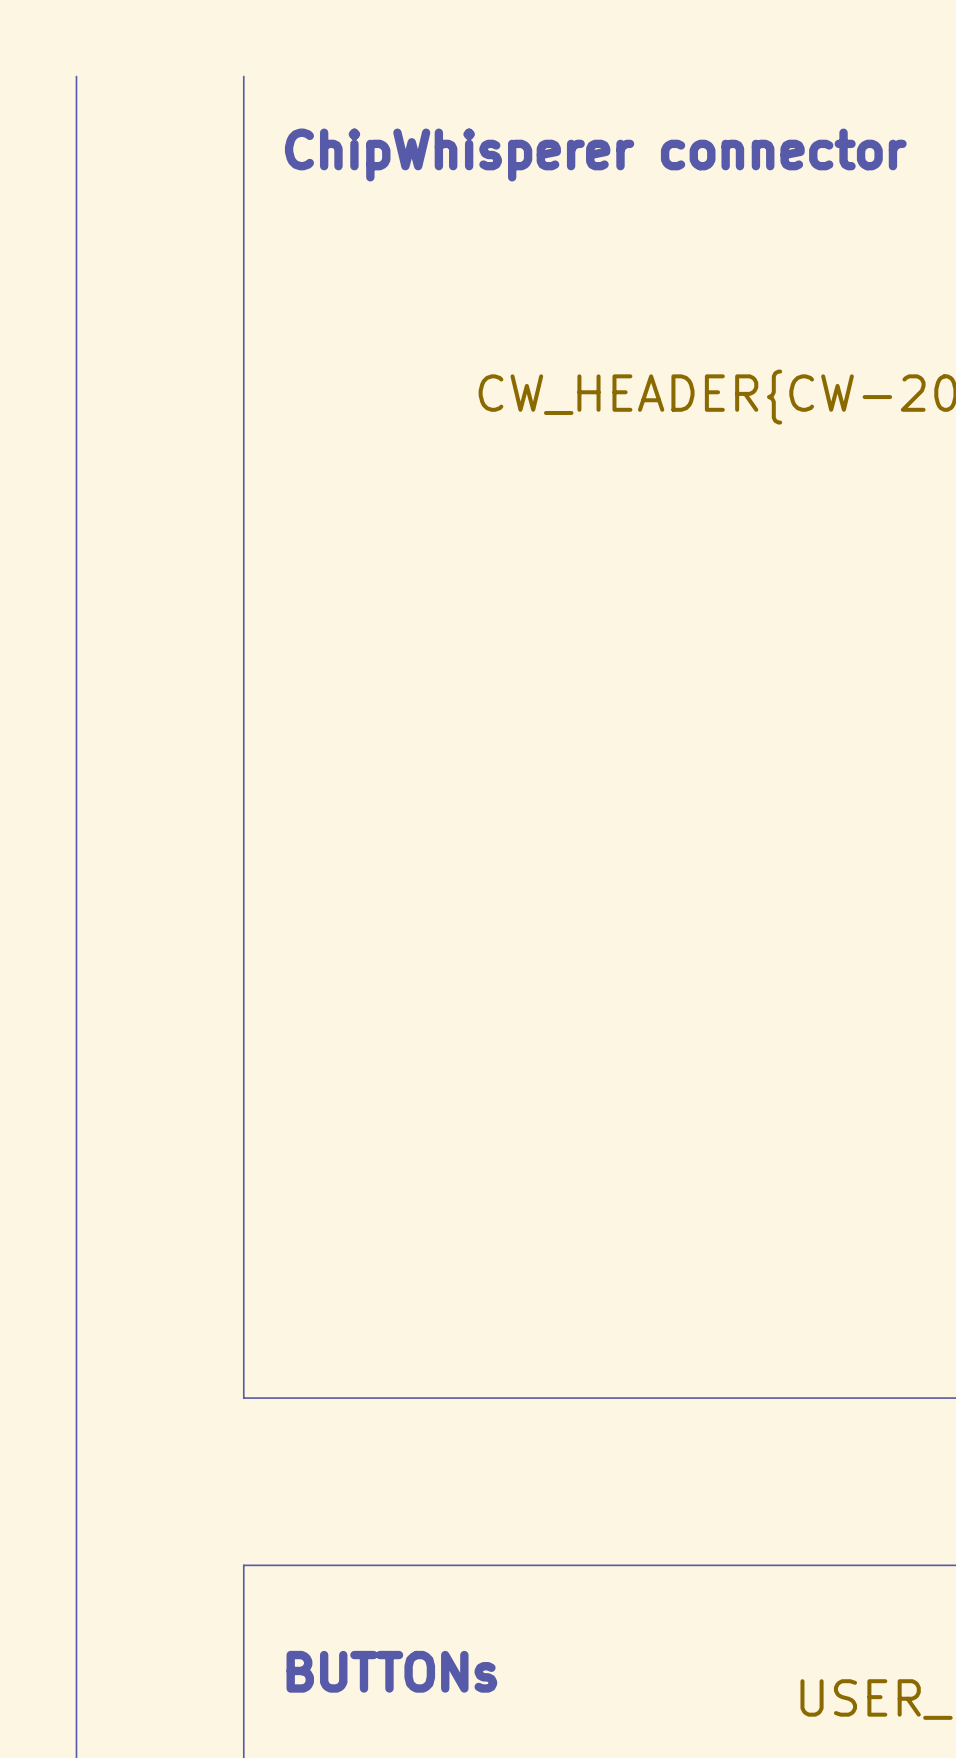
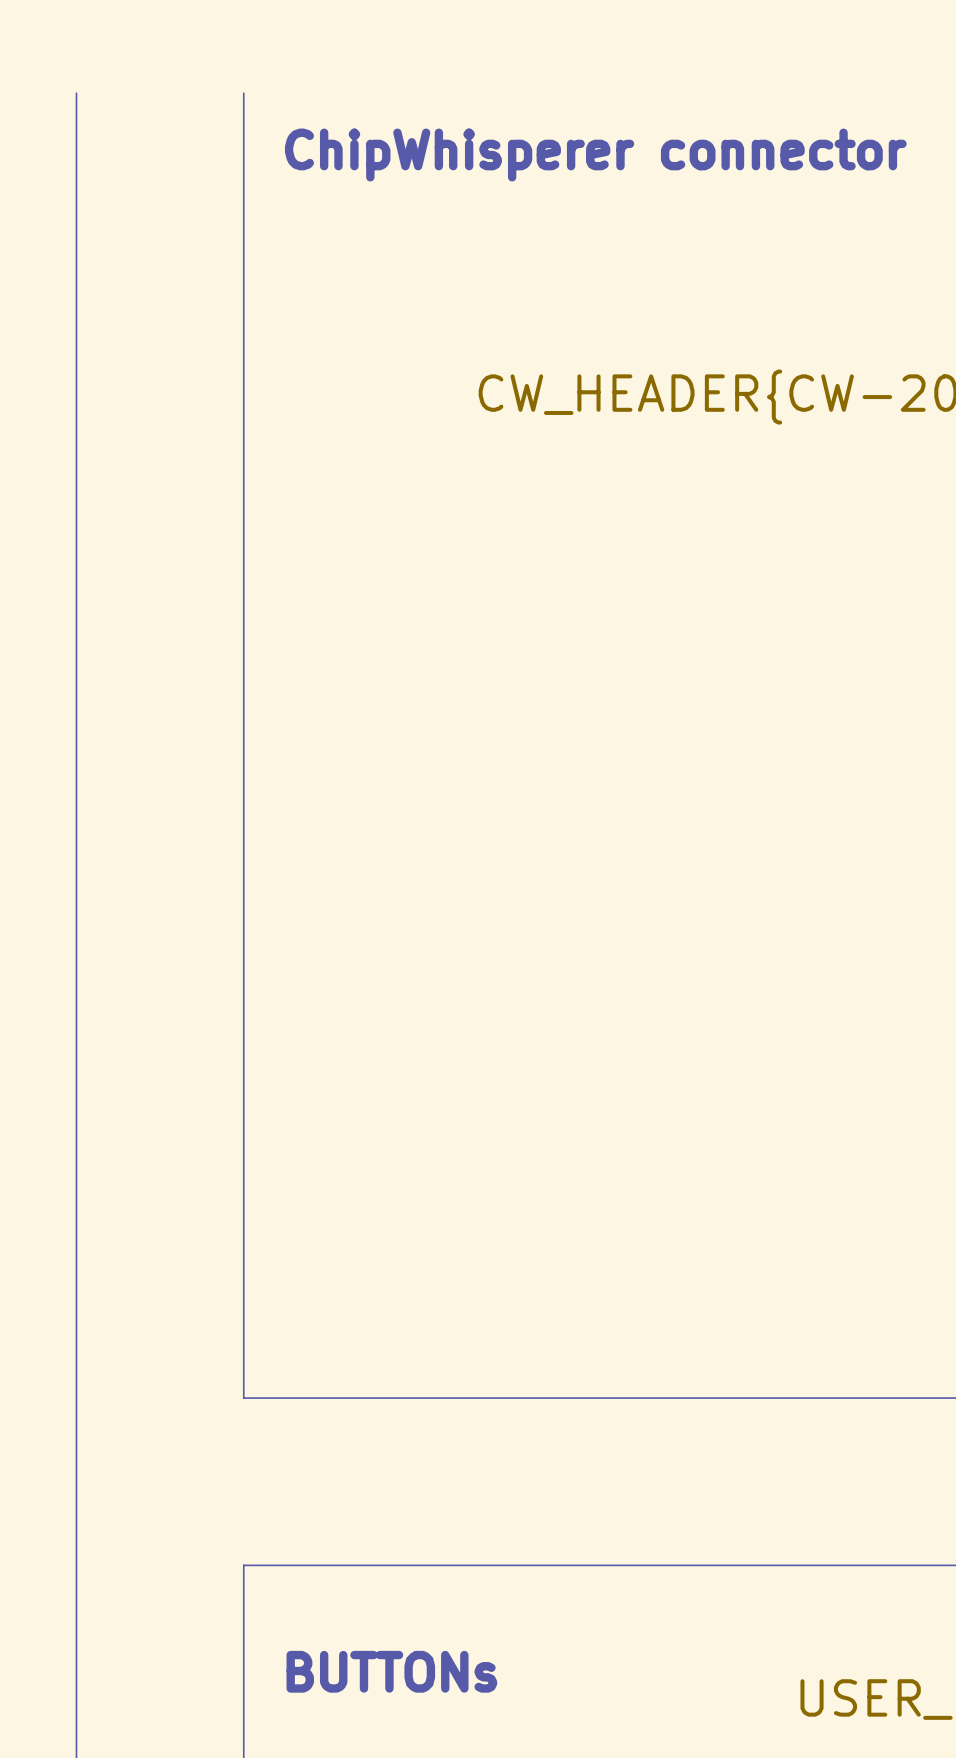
line: (76, 76) (76, 93) -> none
line: (243, 76) (243, 93) -> none

